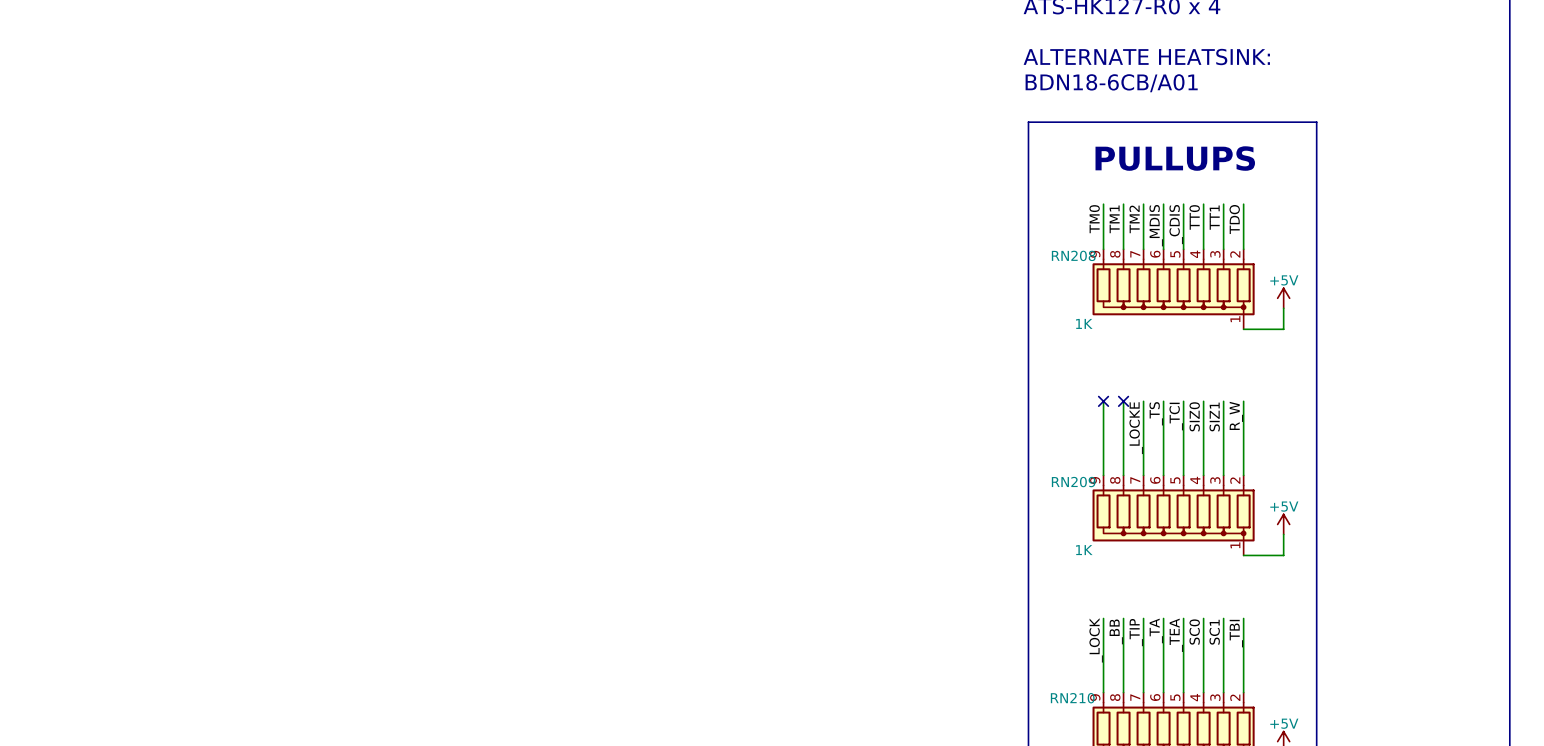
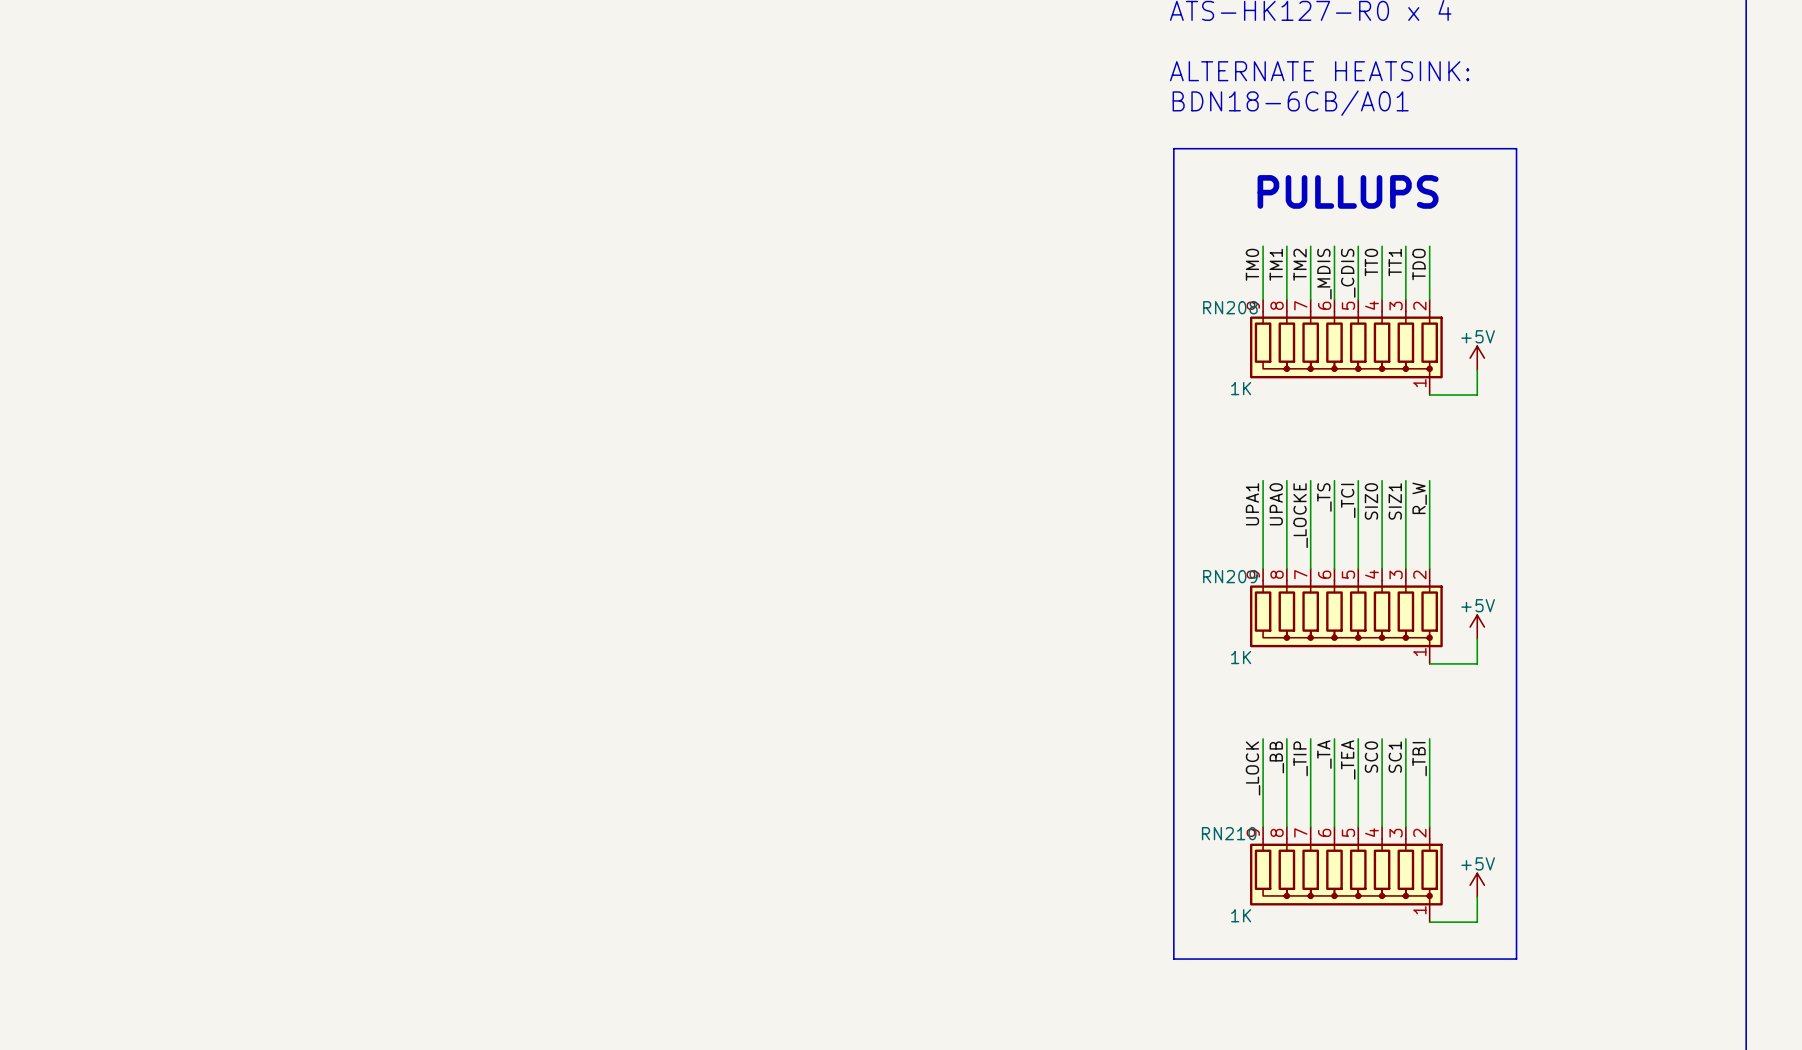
no-connect mark: (1103, 401) -> none
no-connect mark: (1123, 401) -> none
label: none -> UPA1 (1252, 504)
label: none -> UPA0 (1276, 504)

